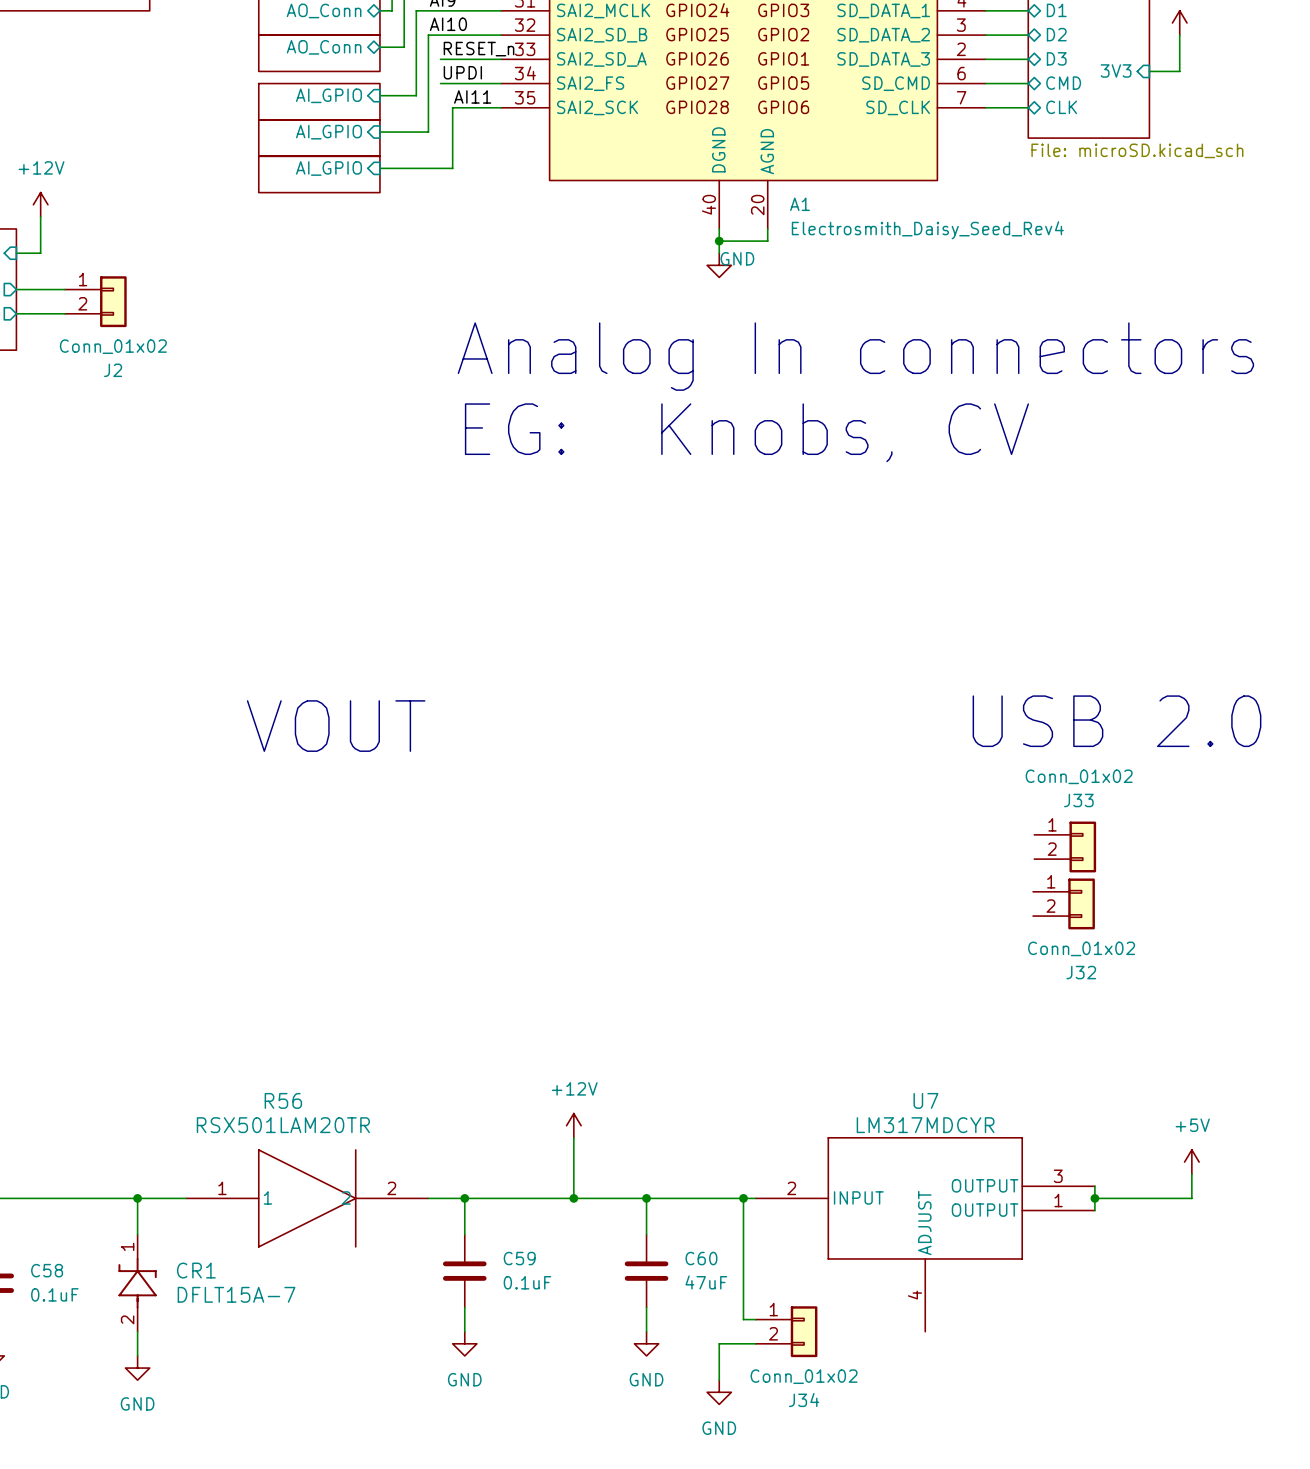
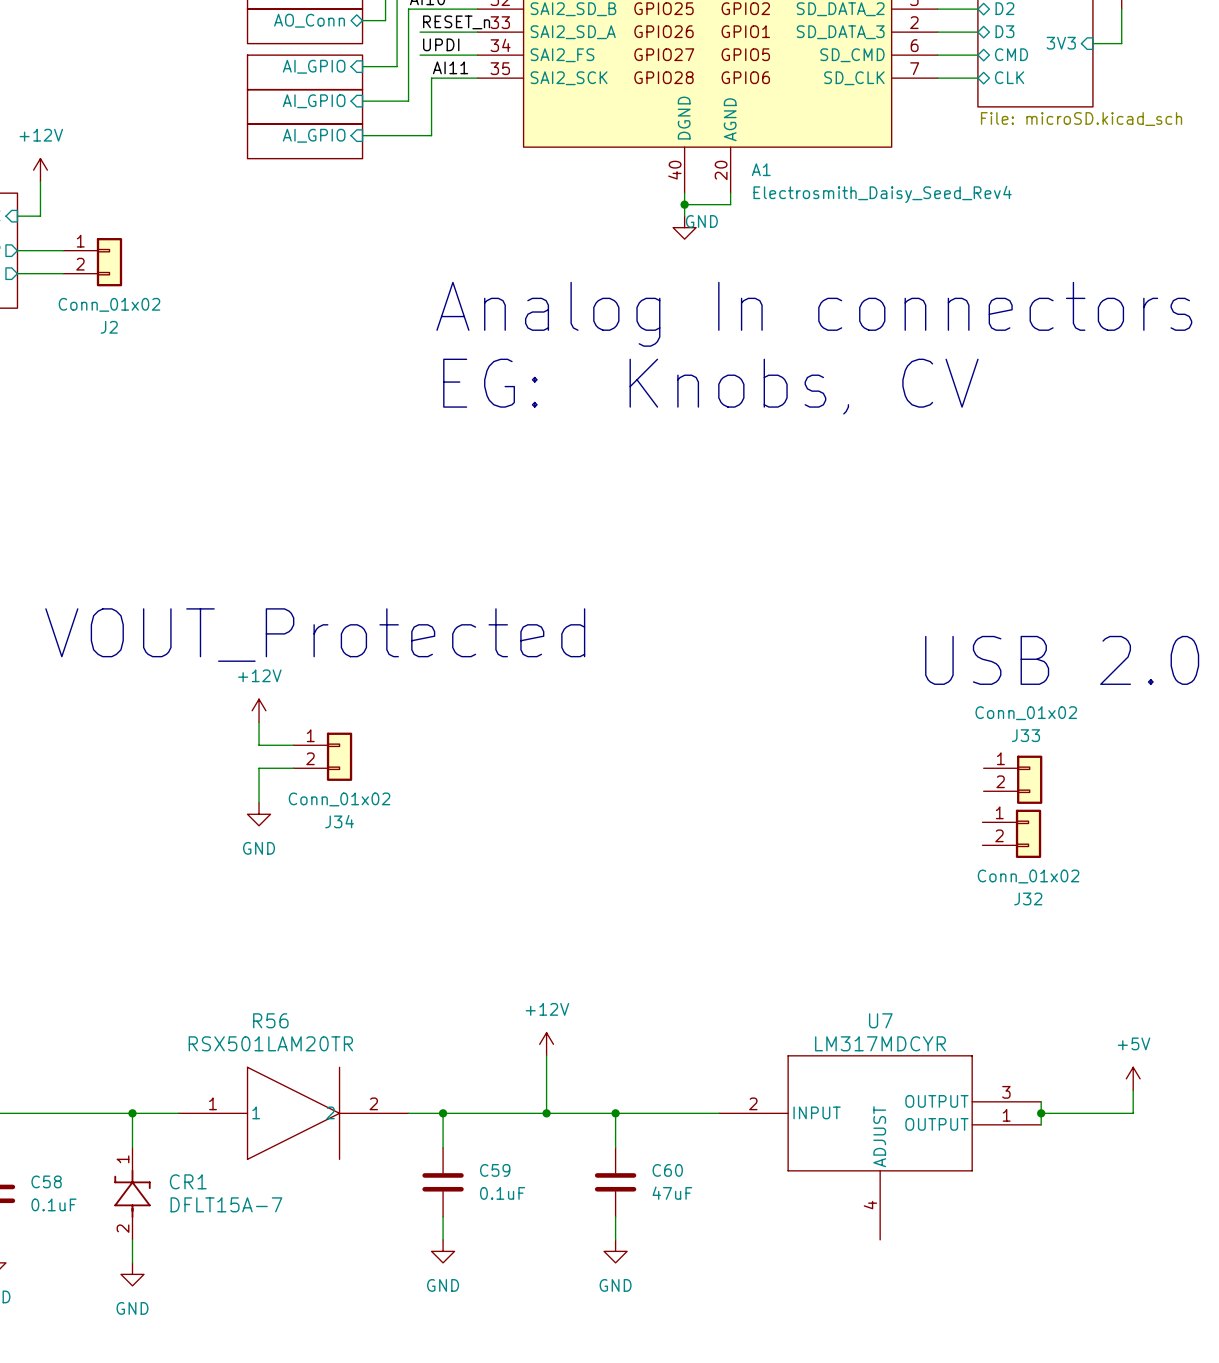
text: none -> VOUT_Protected (315, 635)
text: VOUT (336, 726) -> none
power symbol: none -> +12V (259, 710)
wire: none -> (259, 722) (259, 745) (293, 745)
wire: none -> (293, 768) (259, 768) (259, 802)
power symbol: none -> GND (259, 814)
wire: (743, 1198) (743, 1319) (755, 1319) -> none
junction: (743, 1198) -> none
J34 position: (786, 1331) -> (322, 756)
wire: (755, 1343) (719, 1343) (719, 1380) -> none
power symbol: GND (719, 1392) -> none

